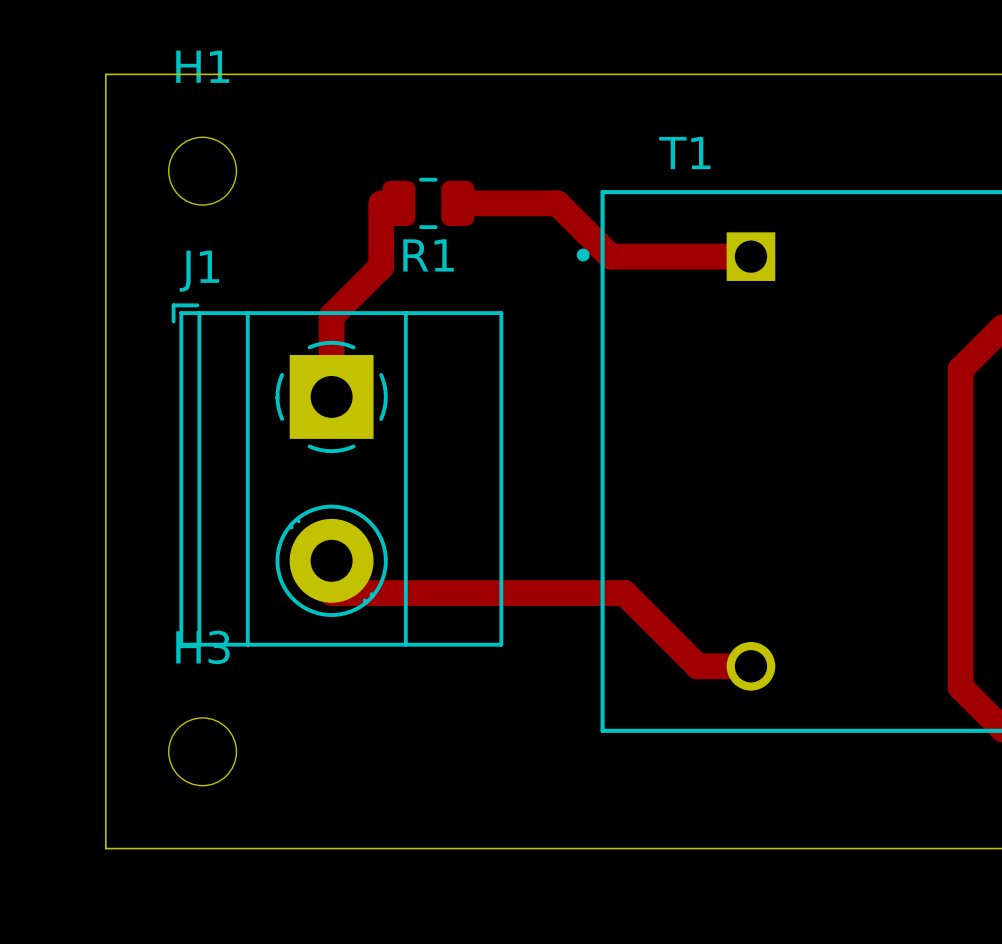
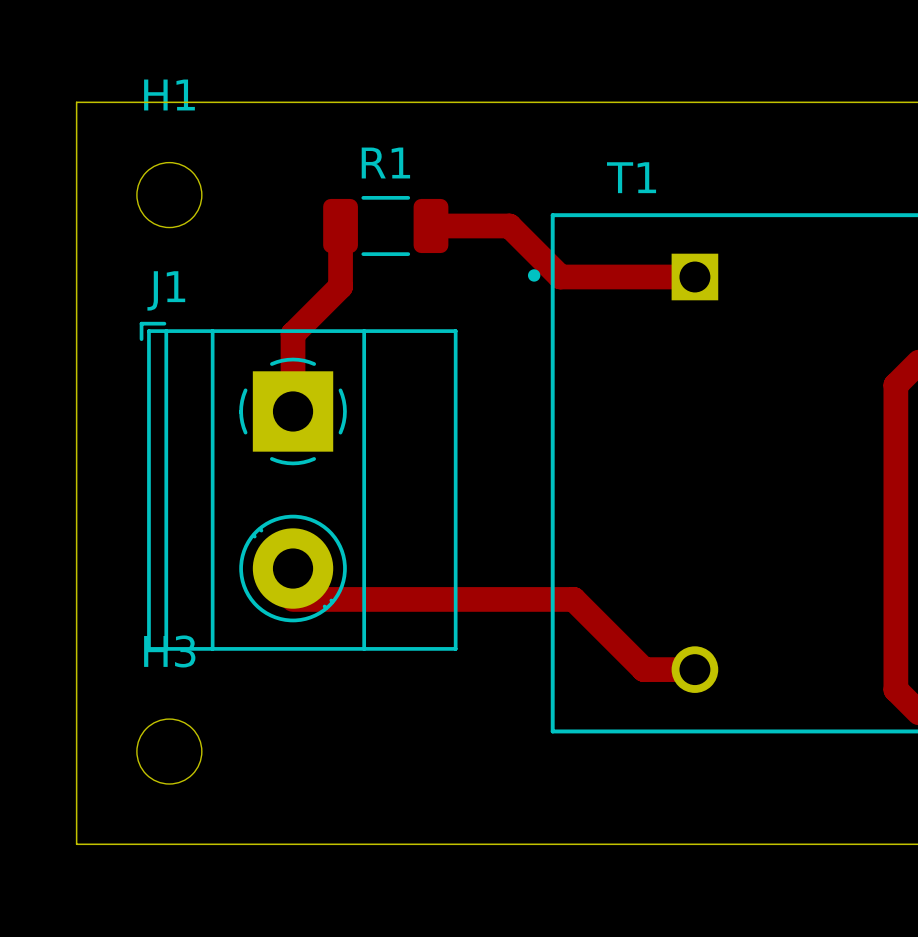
R1 footprint: [382, 177, 475, 230] -> [323, 196, 449, 256]
R1 name position: R1 (428, 255) -> R1 (385, 163)

